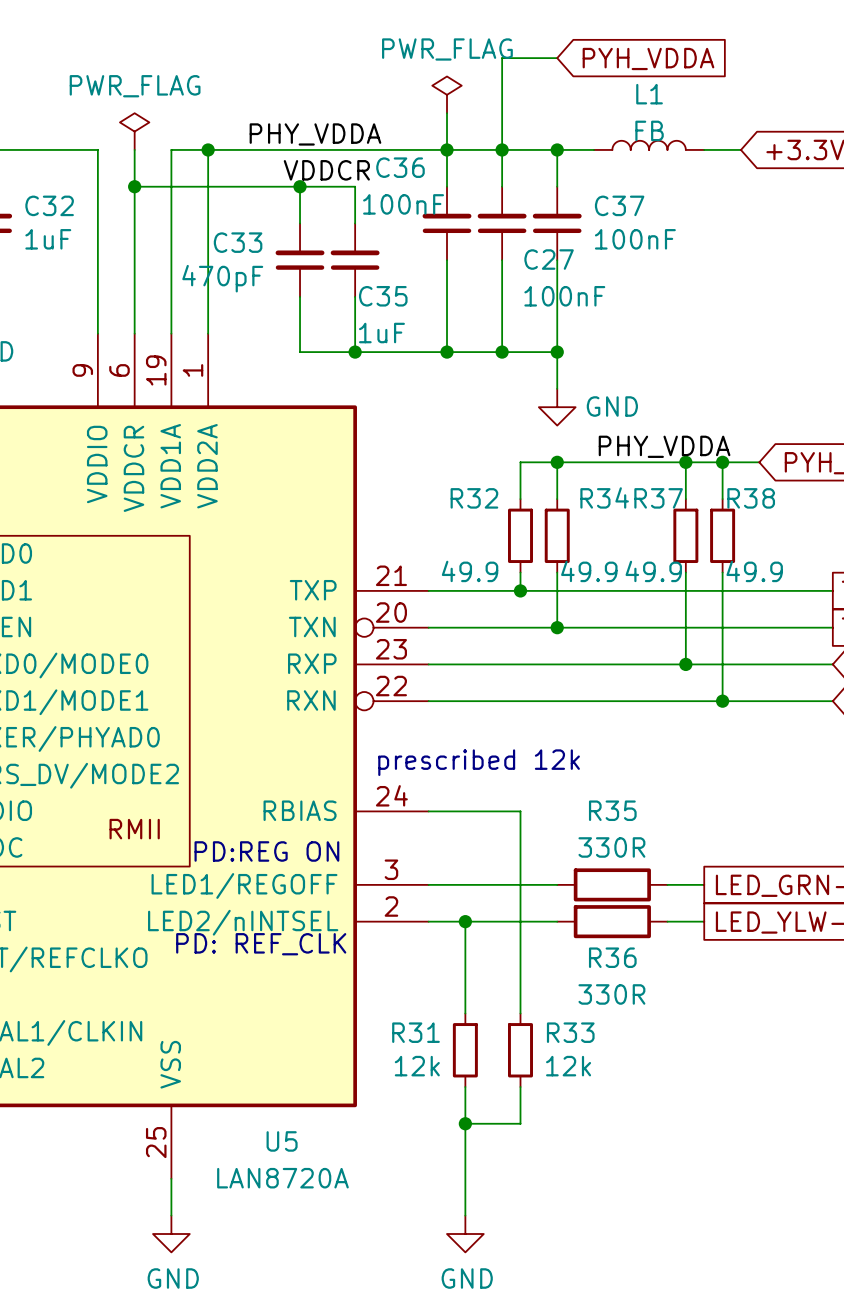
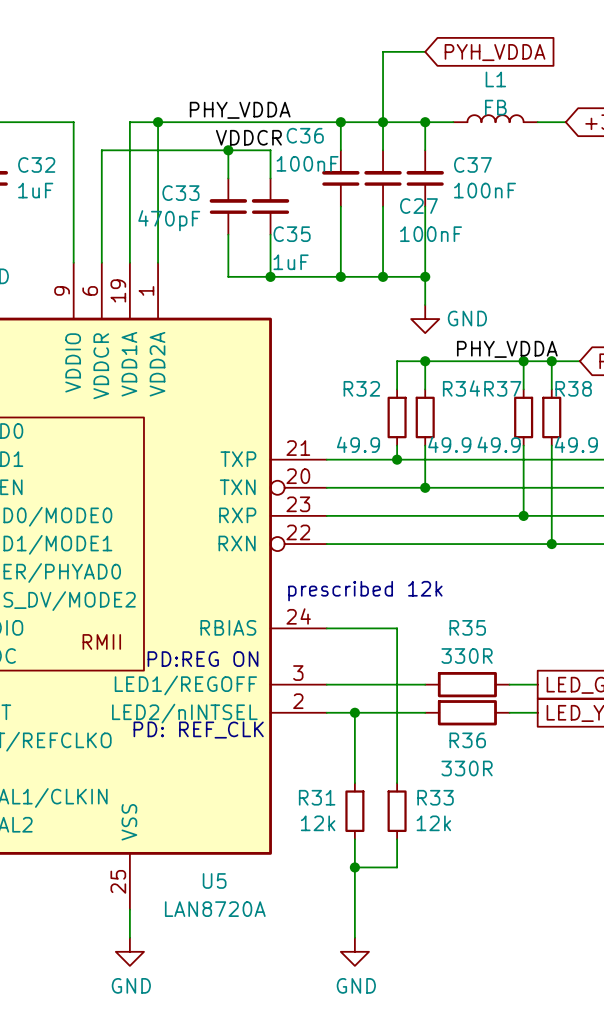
power symbol: PWR_FLAG (447, 94) -> none
wire: (447, 113) (447, 149) -> none
power symbol: PWR_FLAG (134, 131) -> none
wire: (134, 149) (134, 186) -> none
junction: (134, 186) -> none

